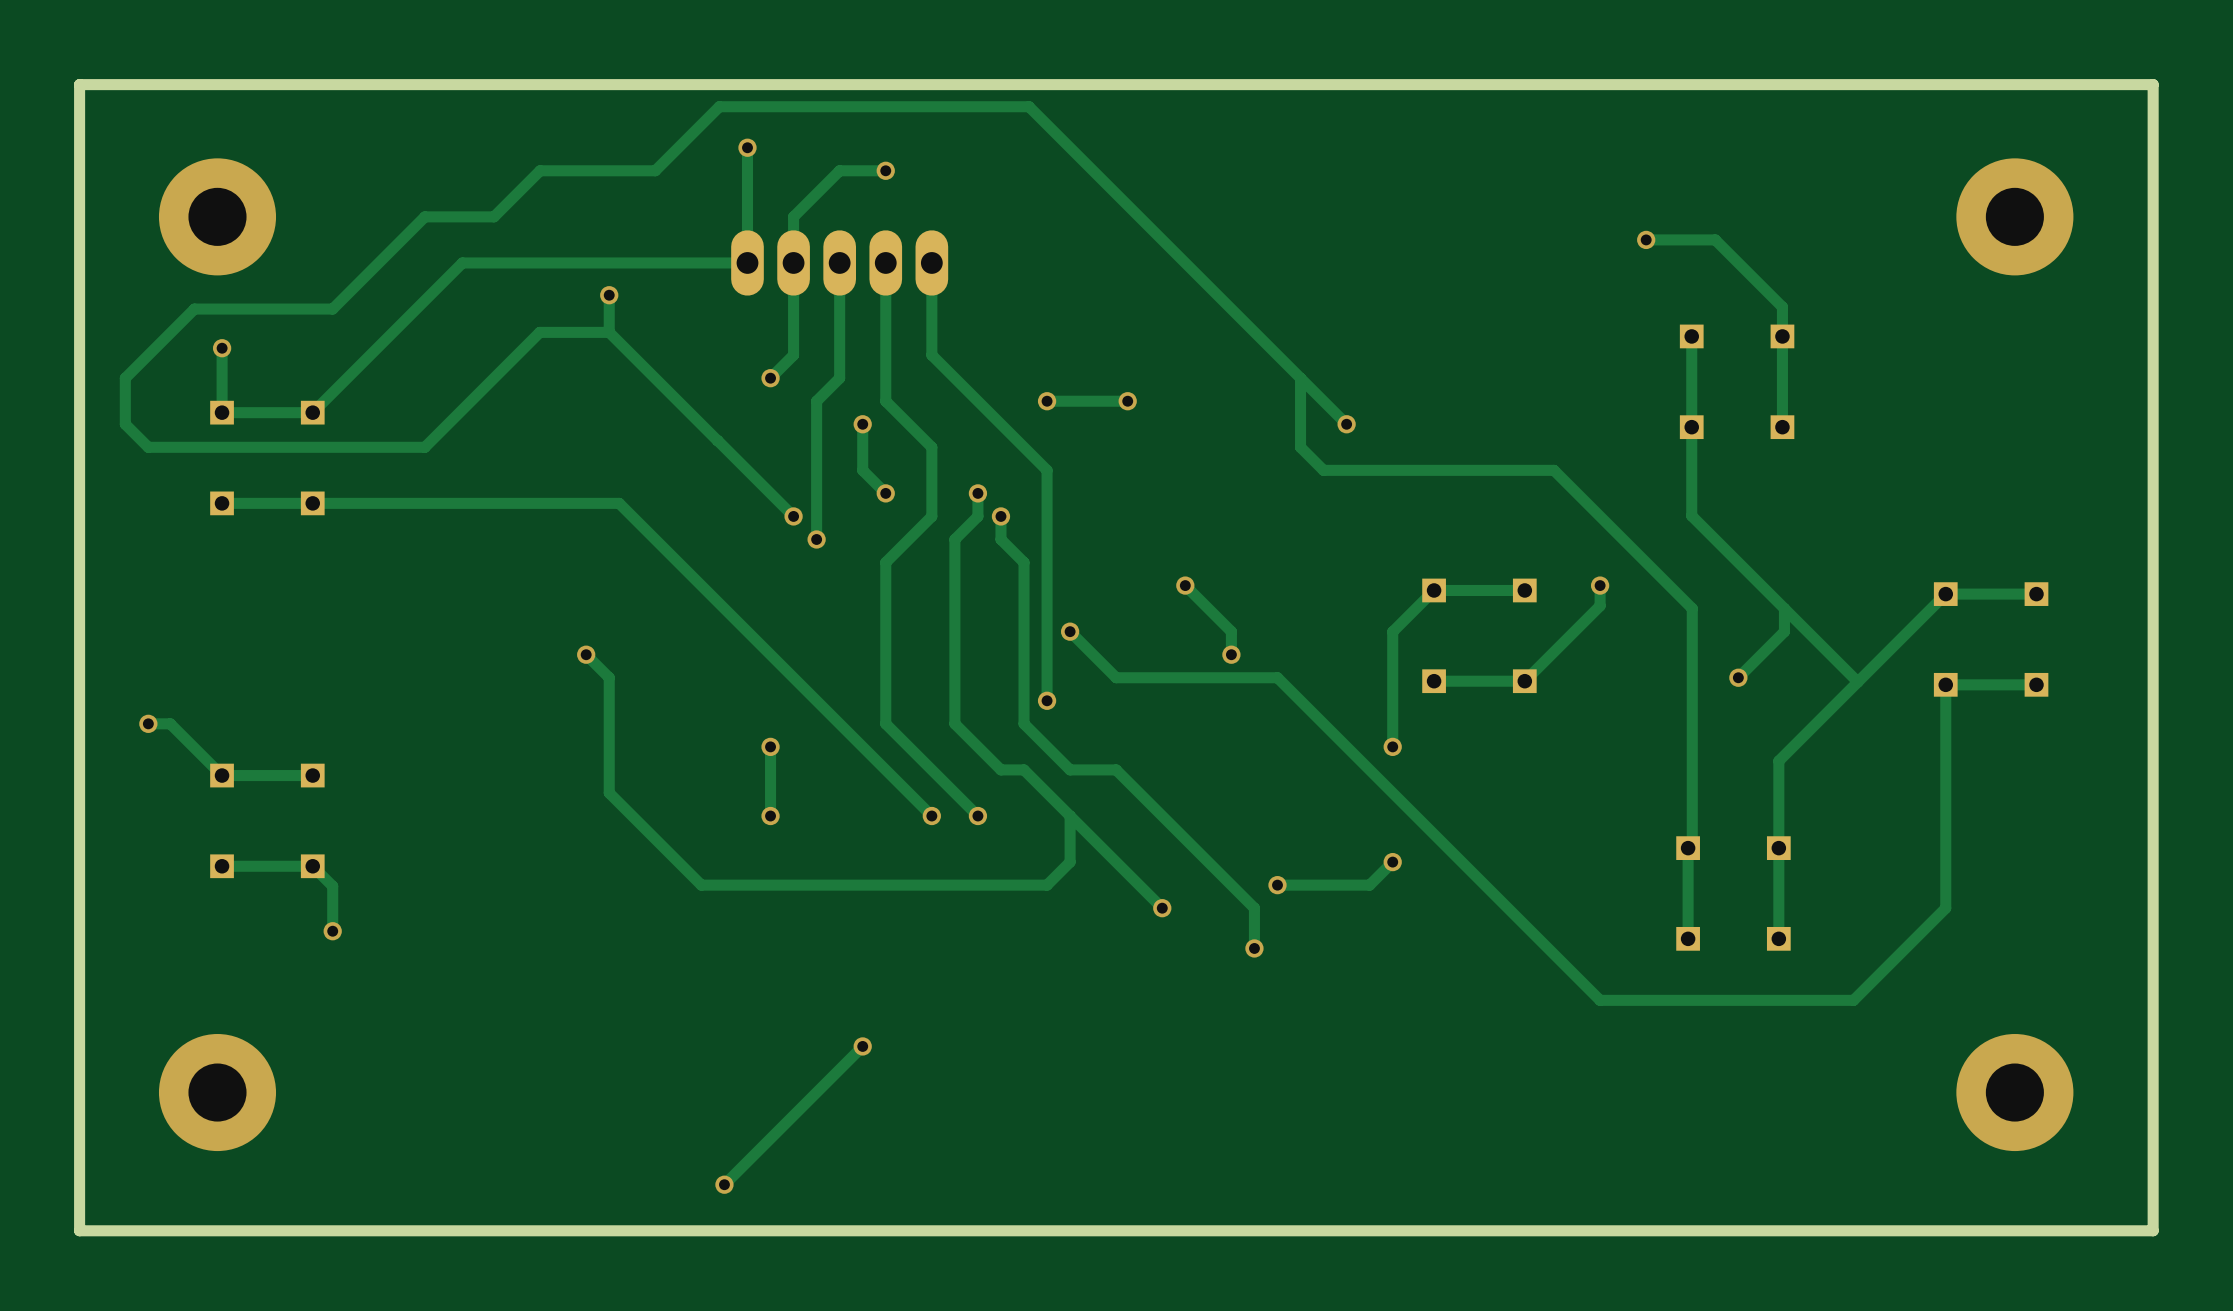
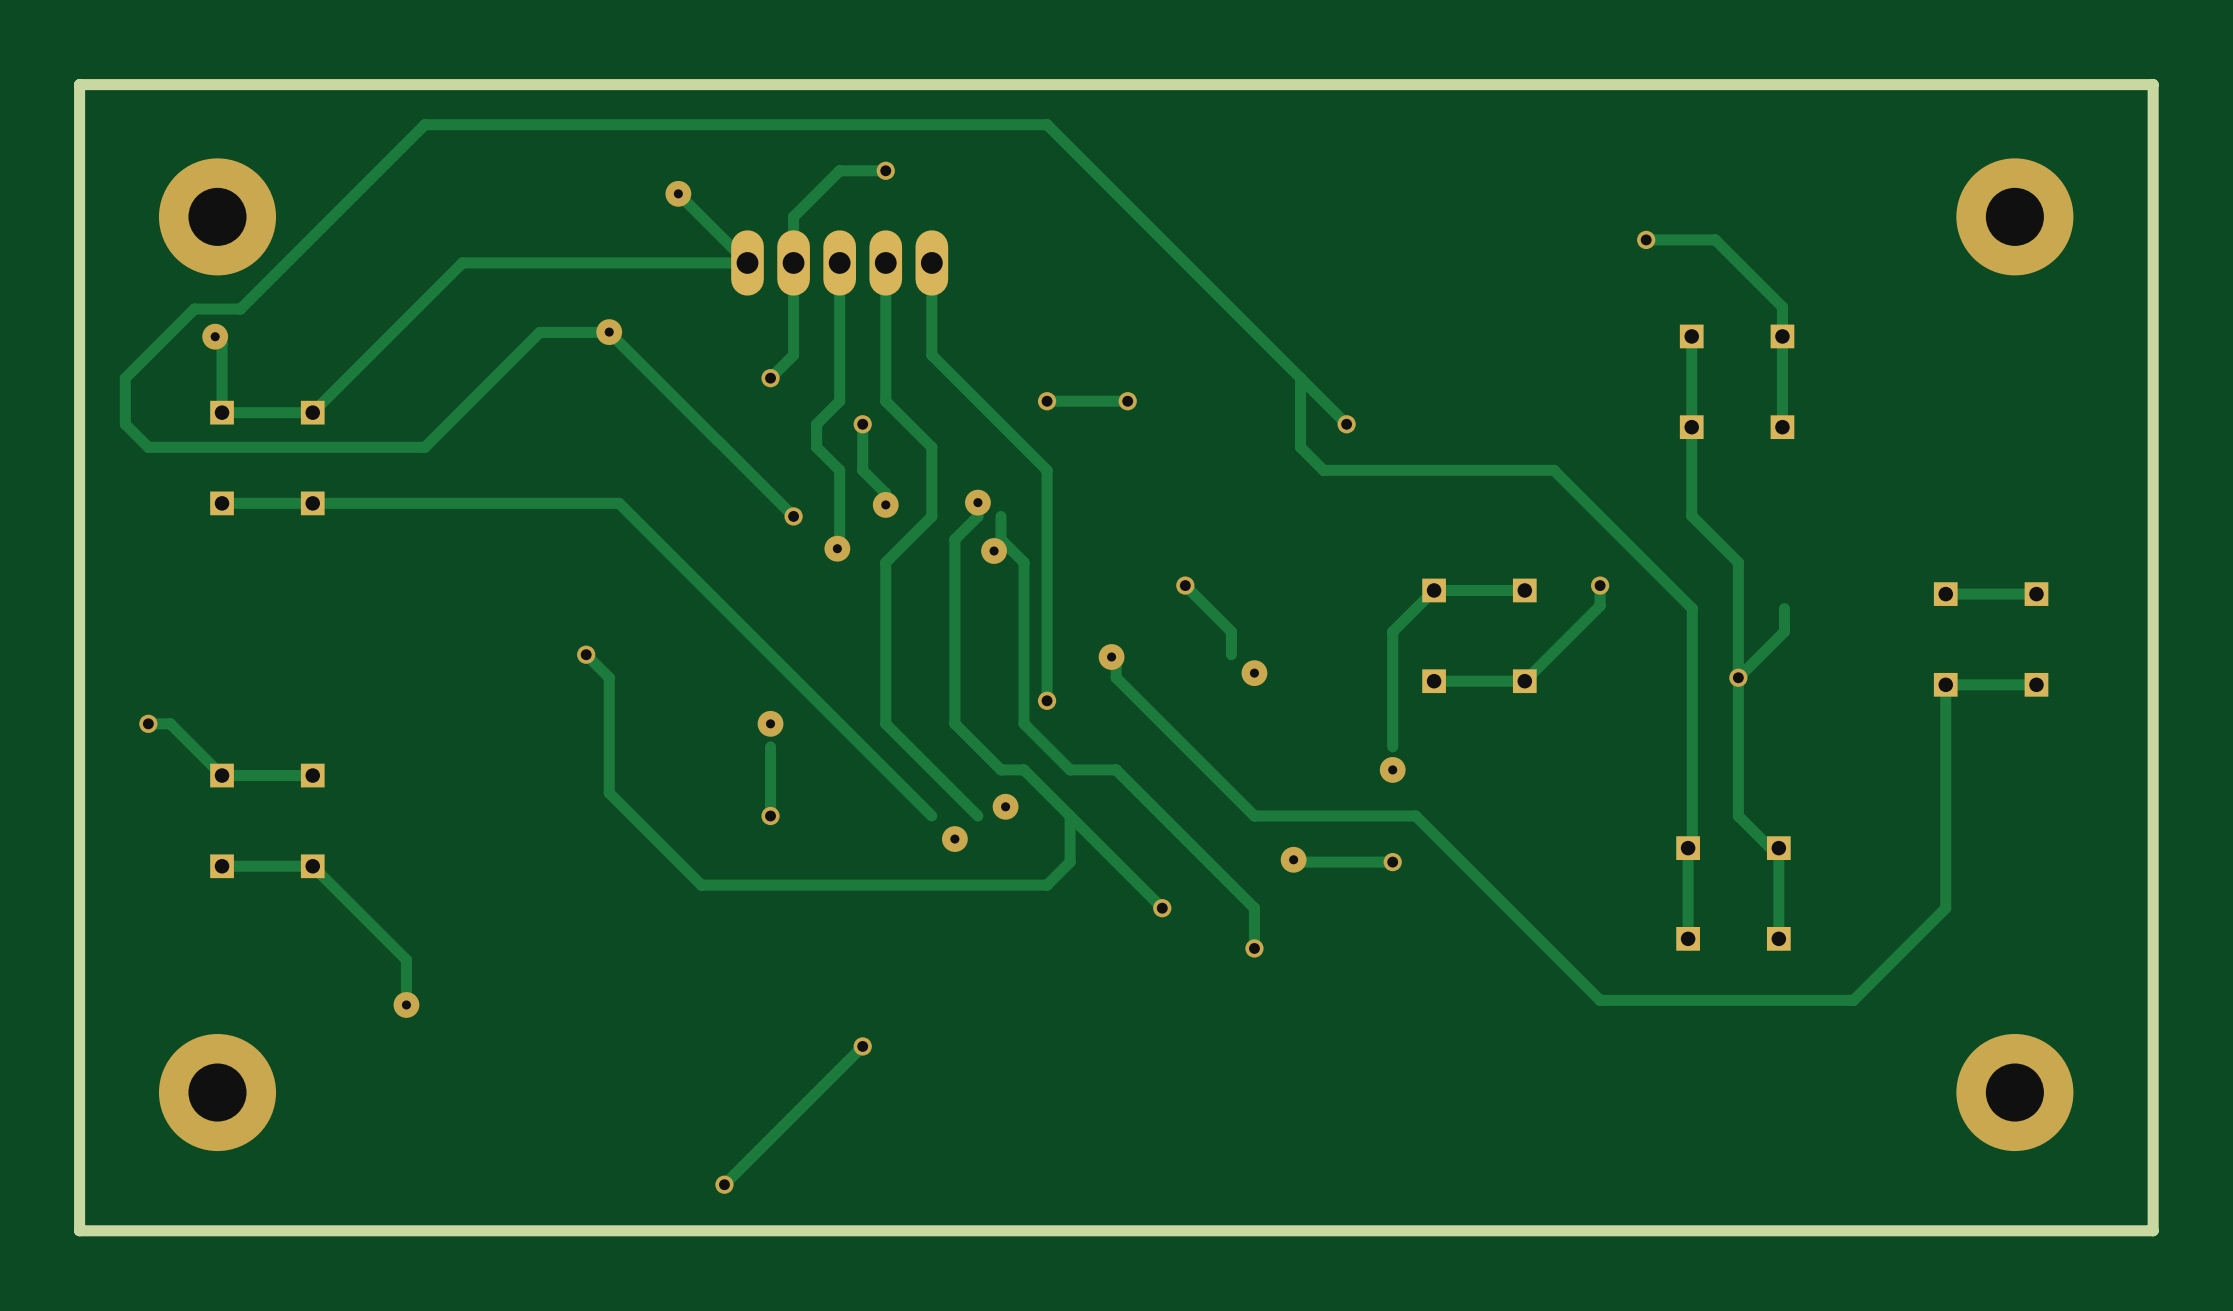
track: (1047, 124) (1029, 106) (719, 106) (655, 170) (540, 170) (494, 216) (424, 216) (332, 309) (240, 309) -> (1047, 124) (424, 124) (240, 309)
track: (747, 147) (747, 262) -> (678, 193) (747, 262)
via: (747, 147) -> none
via: none -> (678, 193)
track: (609, 295) (609, 332) -> none
via: (609, 295) -> none
via: none -> (609, 332)
via size: [212, 339, 232, 358] -> [202, 323, 229, 350]
track: (839, 378) (816, 401) (816, 424) -> (839, 378) (839, 401) (816, 424)
track: (816, 447) (816, 539) -> (816, 447) (839, 470) (839, 546) (837, 548)
via size: [876, 484, 895, 503] -> [872, 492, 899, 518]
via size: [968, 484, 988, 503] -> [965, 489, 991, 516]
via: (1000, 516) -> none
via: (816, 539) -> none
via: none -> (837, 548)
via: none -> (994, 551)
track: (1738, 562) (1857, 682) -> (1738, 562) (1738, 816) (1770, 848) (1778, 848)
track: (1945, 594) (1778, 761) (1778, 848) -> none
track: (1070, 631) (1116, 677) (1277, 677) (1415, 816) -> (1111, 657) (1116, 661) (1116, 677) (1254, 816) (1415, 816)
via: (1070, 631) -> none
via: (1231, 654) -> none
via: none -> (1111, 657)
via: none -> (1254, 673)
via: none -> (770, 723)
via: (770, 746) -> none
via: (1392, 746) -> none
via: none -> (1392, 769)
via: none -> (1005, 806)
via: (931, 816) -> none
via: (977, 816) -> none
via: none -> (954, 839)
via: none -> (1293, 859)
track: (1392, 862) (1369, 885) (1277, 885) -> (1392, 862) (1295, 862) (1293, 859)
via: (1277, 885) -> none
track: (332, 886) (332, 931) -> (332, 886) (406, 959) (406, 1004)
via: (332, 931) -> none
via: none -> (406, 1004)

